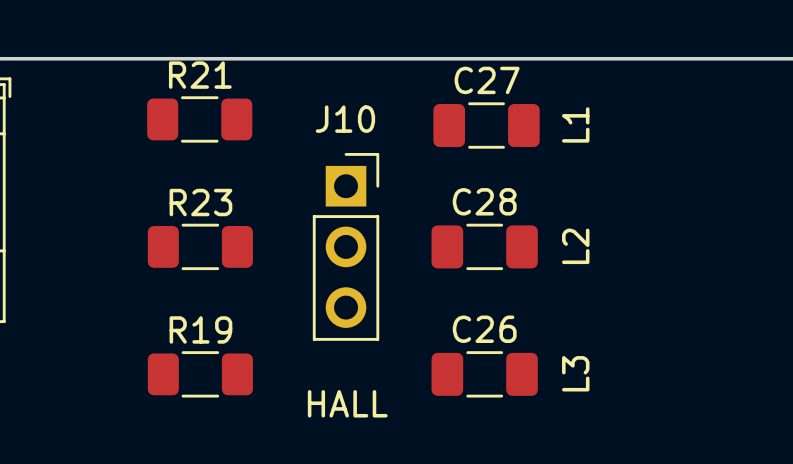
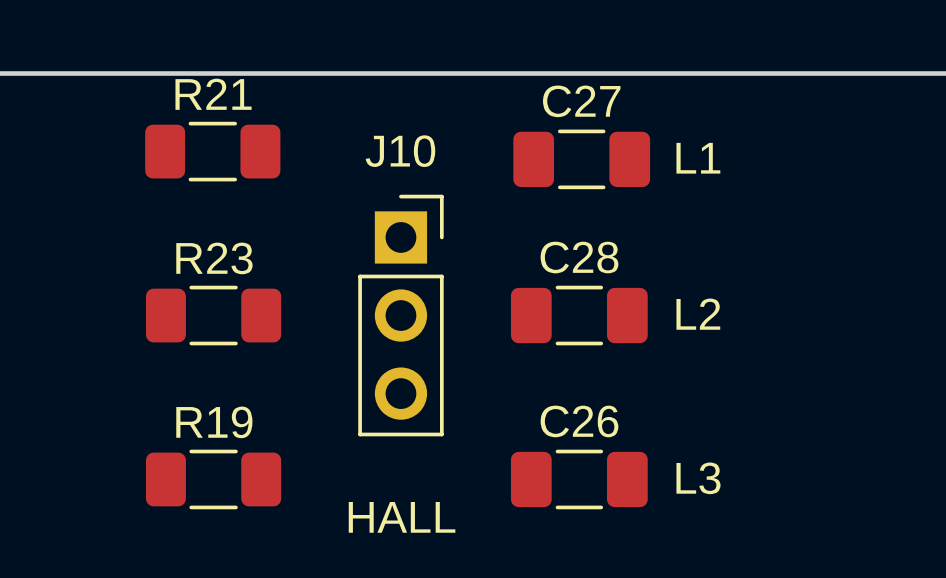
text rotation: 0° (575, 124) -> 90° clockwise (698, 158)
text rotation: 0° (575, 246) -> 90° clockwise (698, 314)
text rotation: 0° (575, 373) -> 90° clockwise (698, 478)

